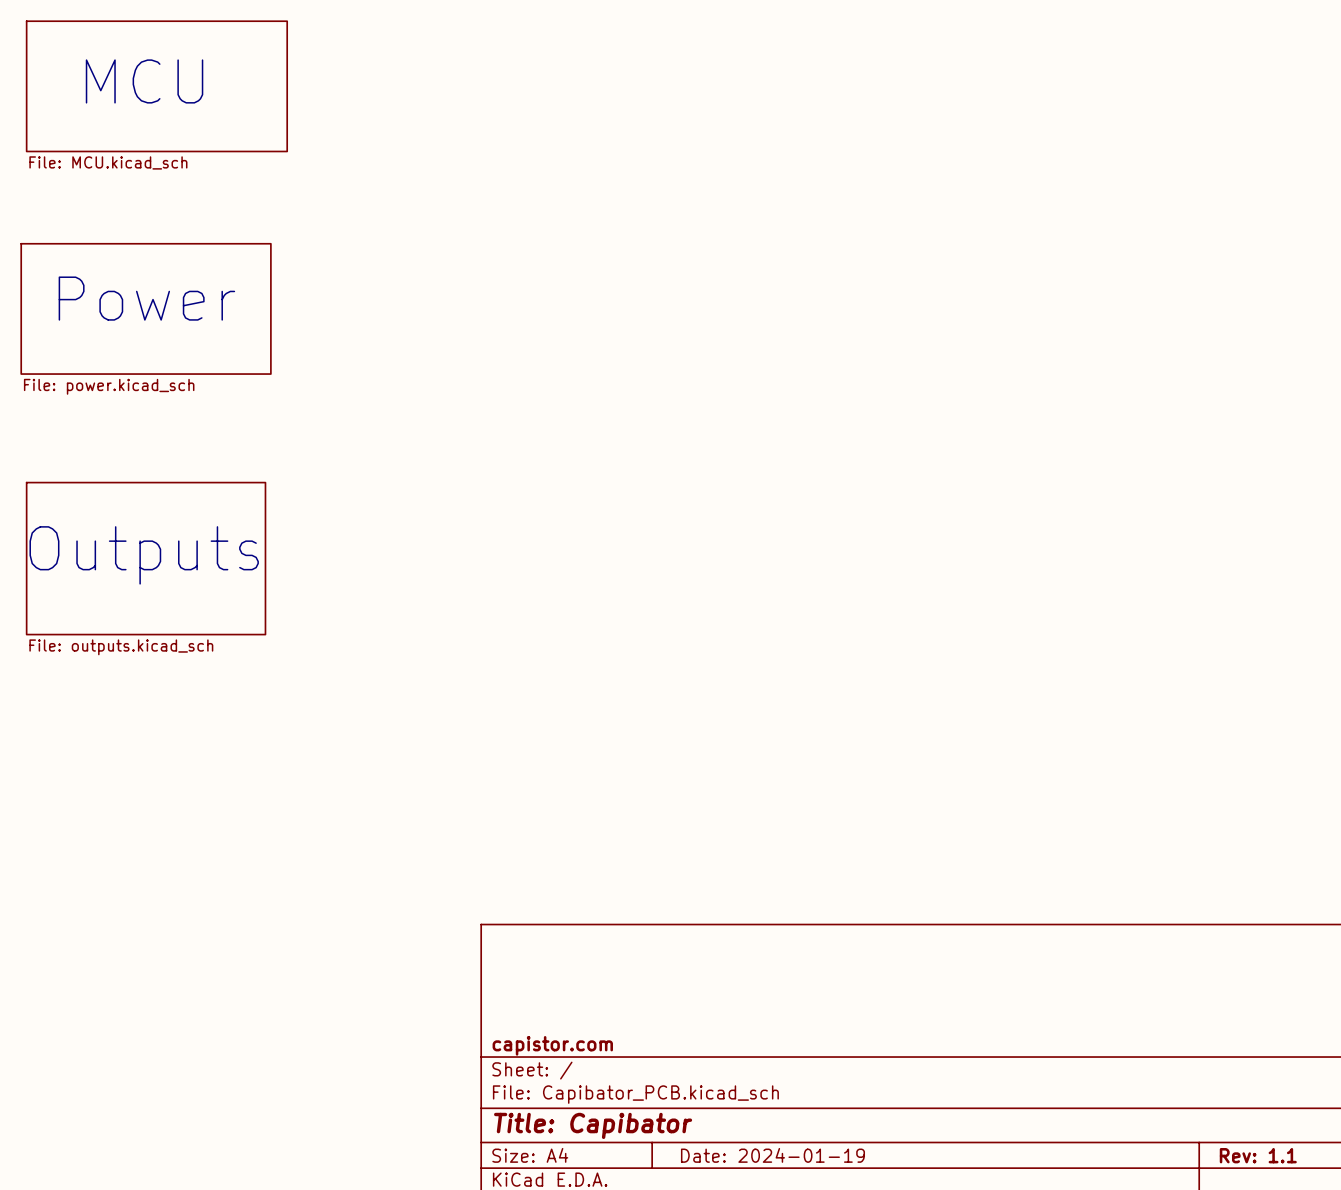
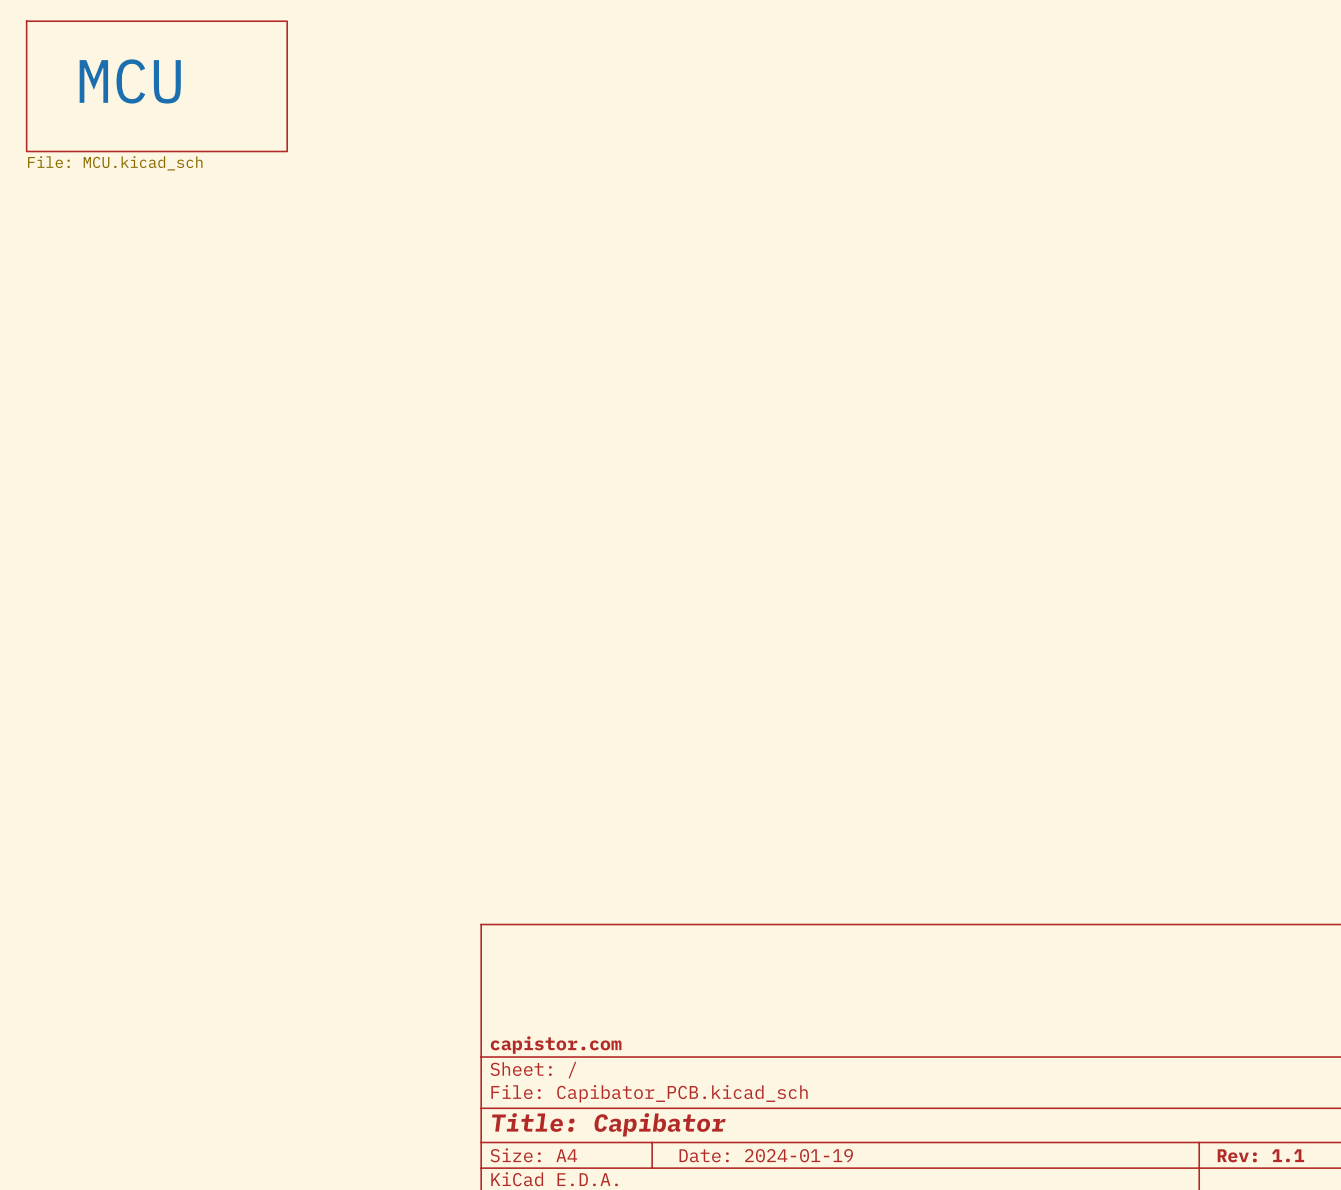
sheet Power: File: power.kicad_sch (146, 308) -> none
sheet Outputs: File: outputs.kicad_sch (146, 558) -> none

